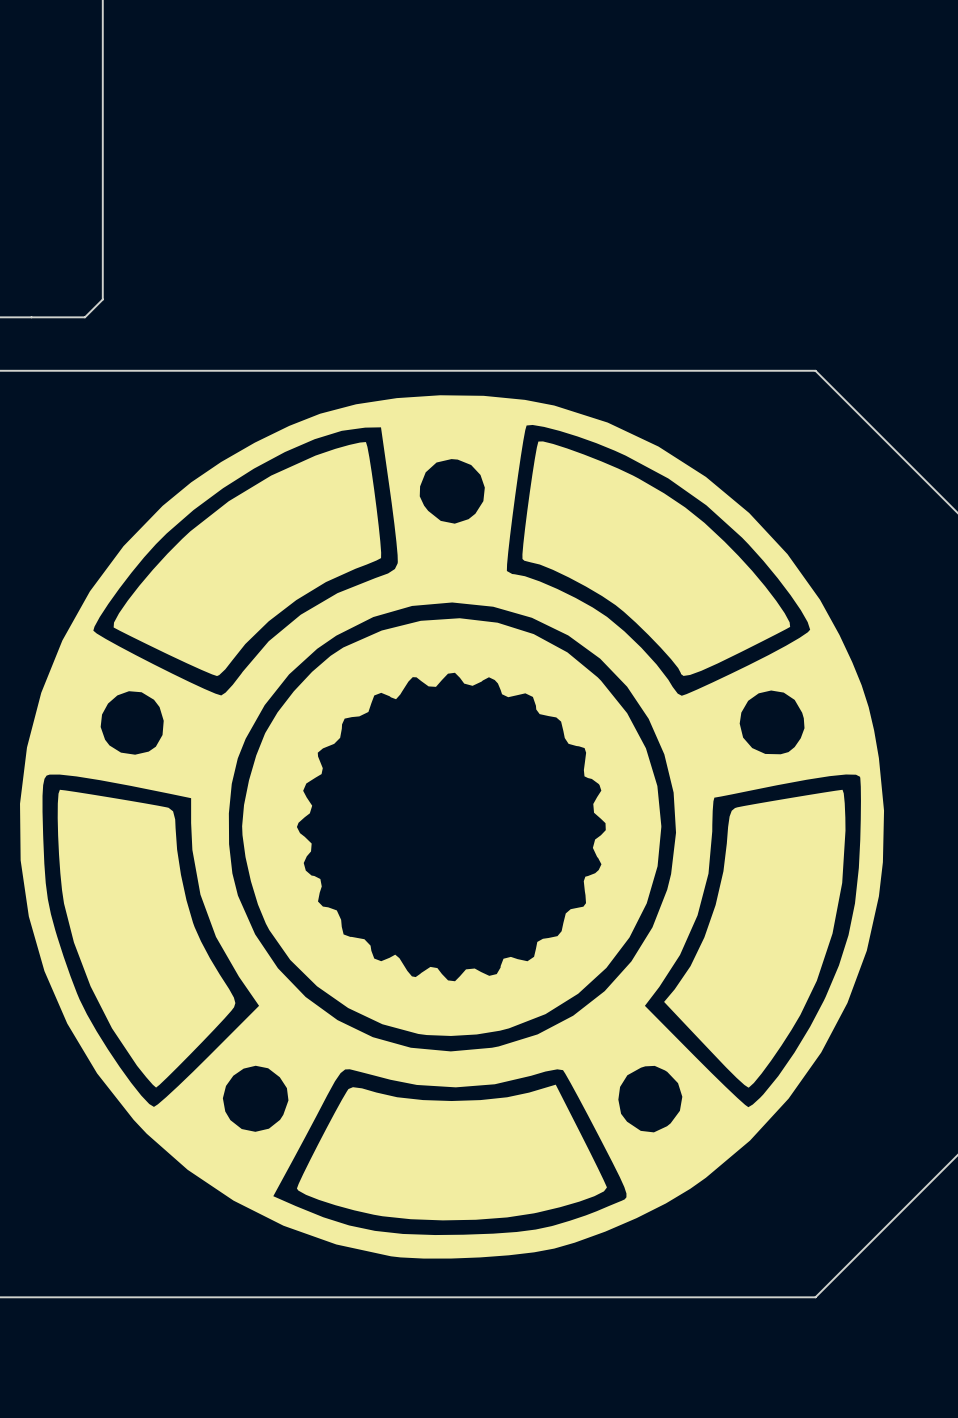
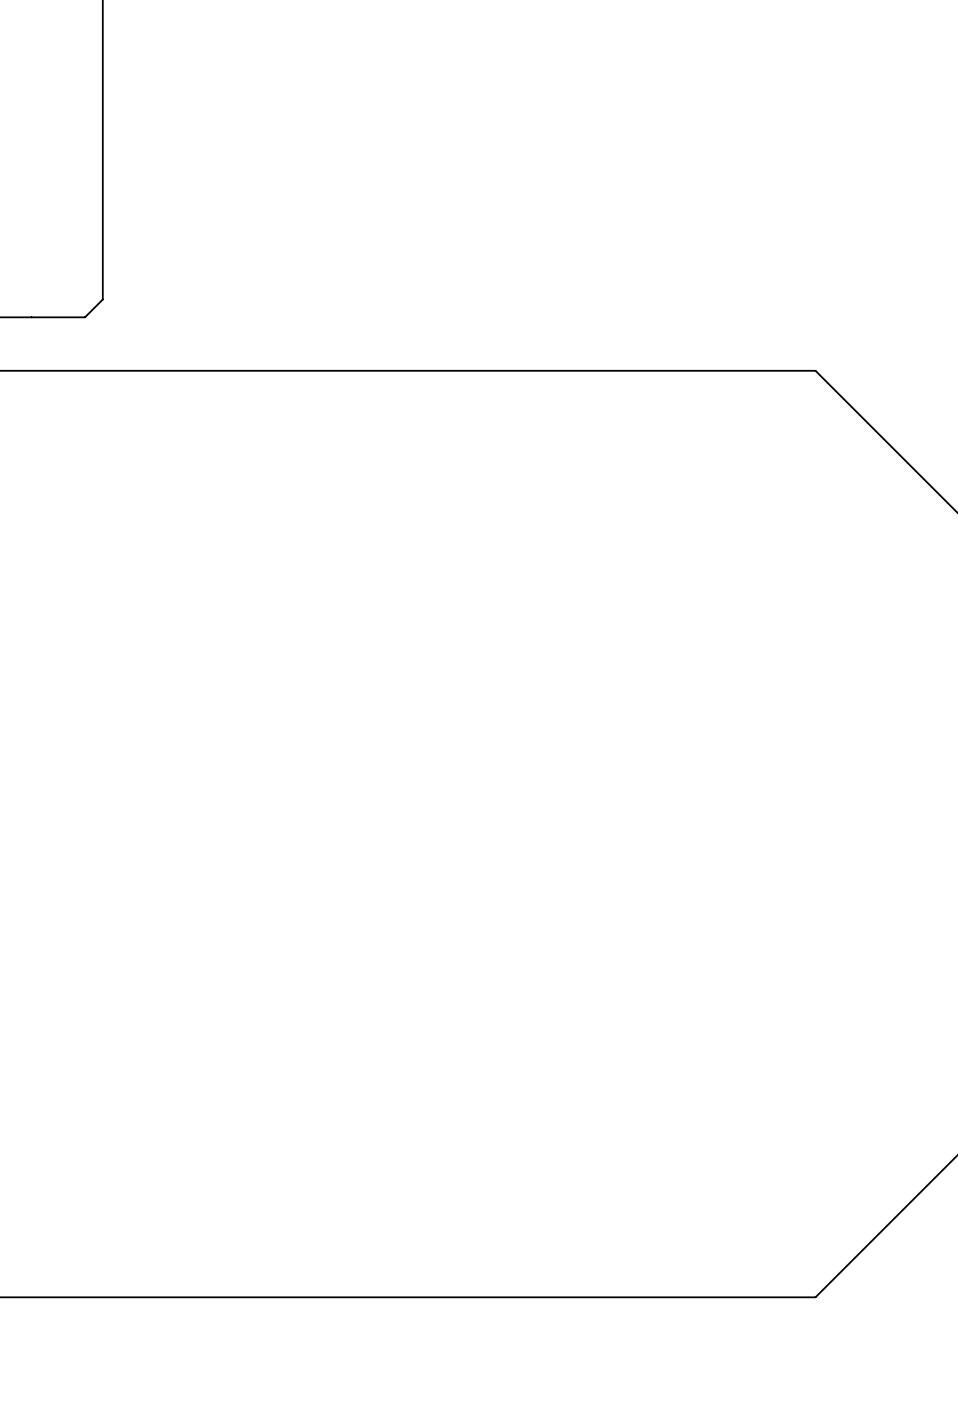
drawing: [20, 395, 885, 1259] -> none

